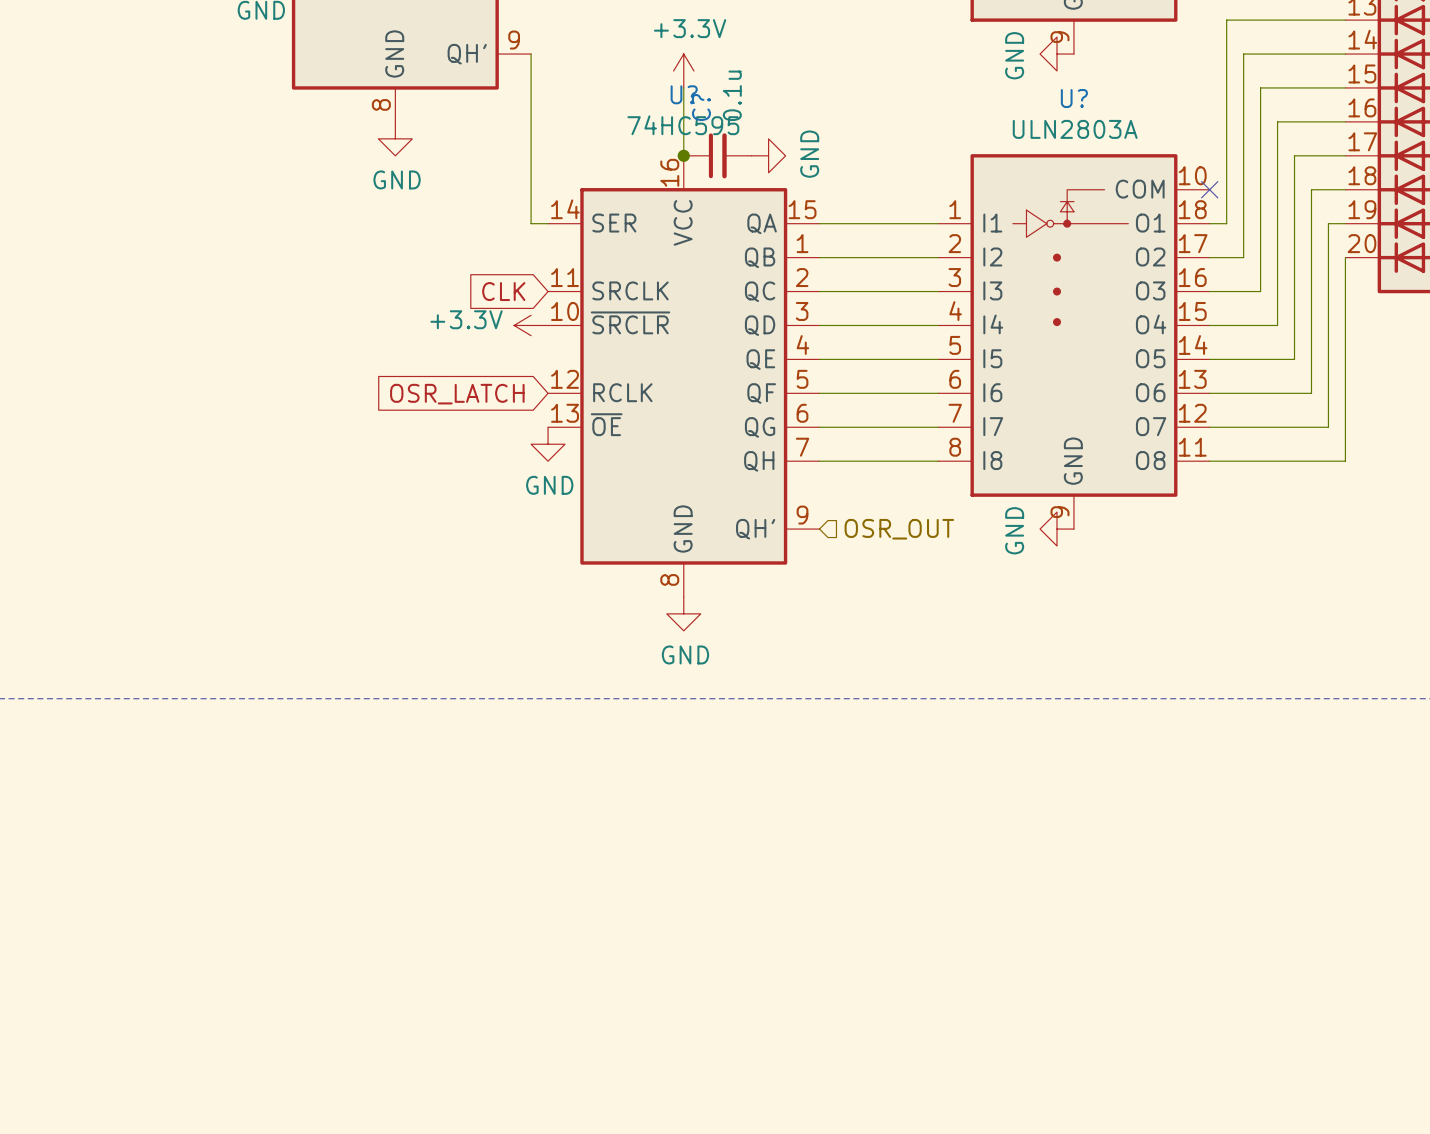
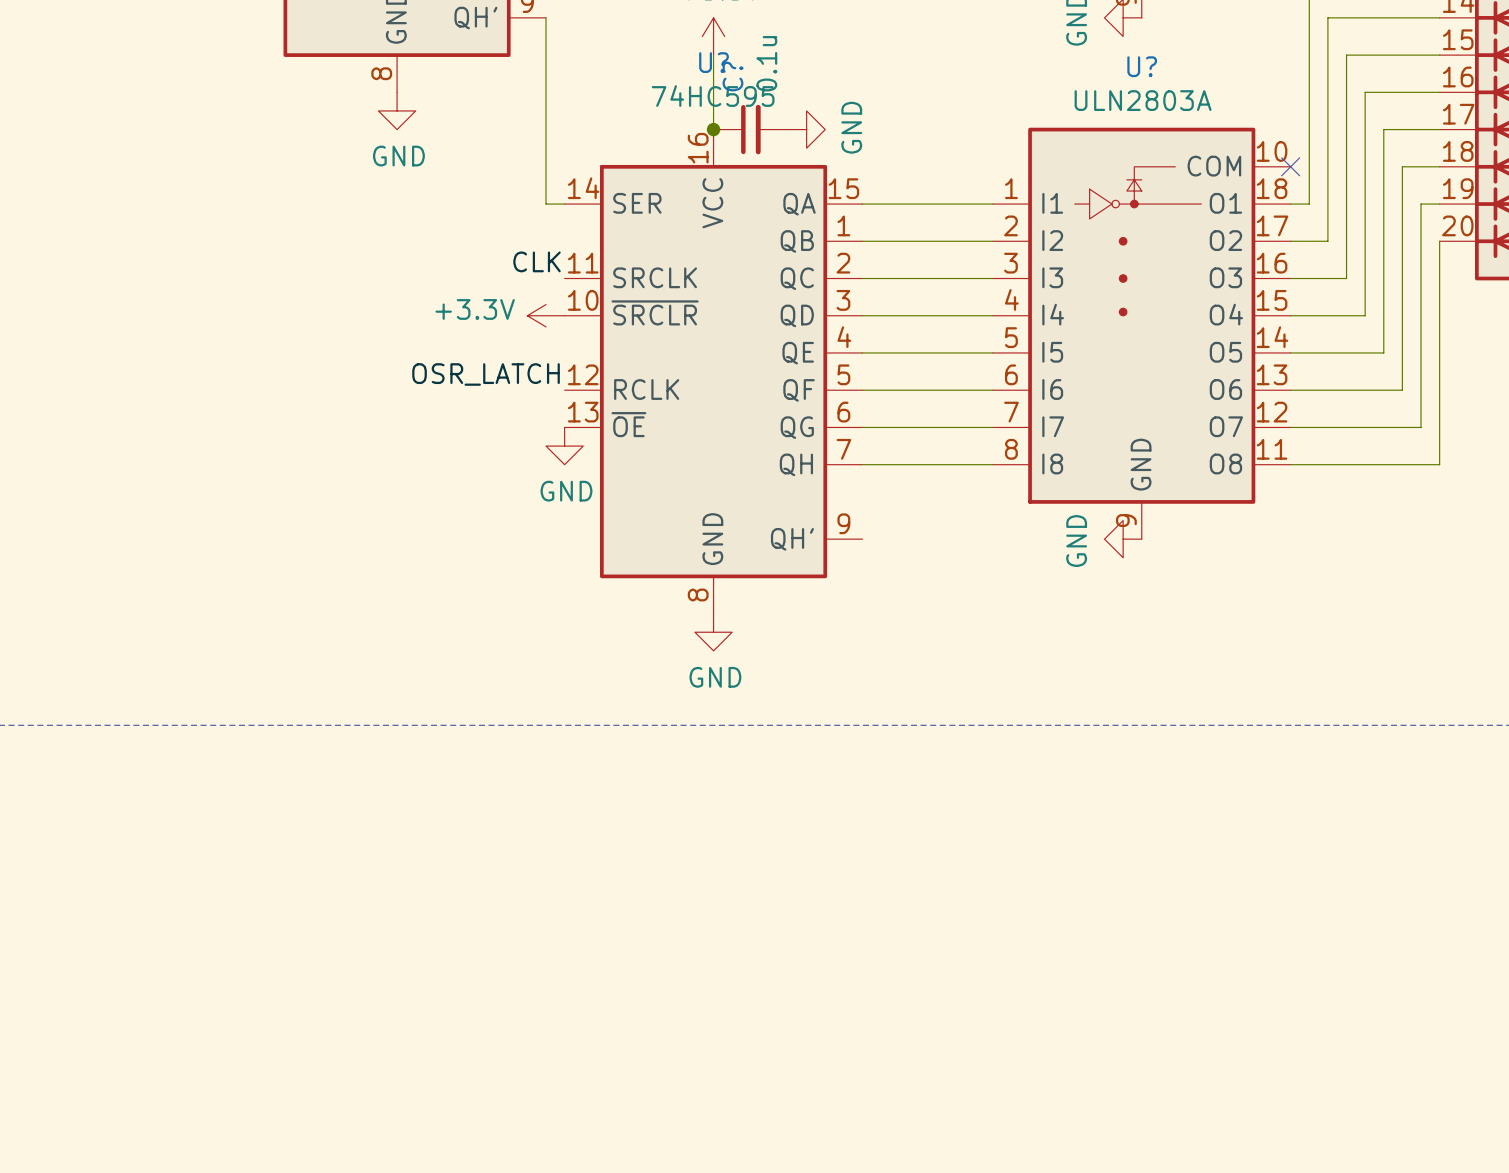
label: none -> CLK (537, 261)
global label: CLK (503, 291) -> none
label: none -> OSR_LATCH (486, 374)
global label: OSR_LATCH (457, 394) -> none
hierarchical label: OSR_OUT (899, 529) -> none

